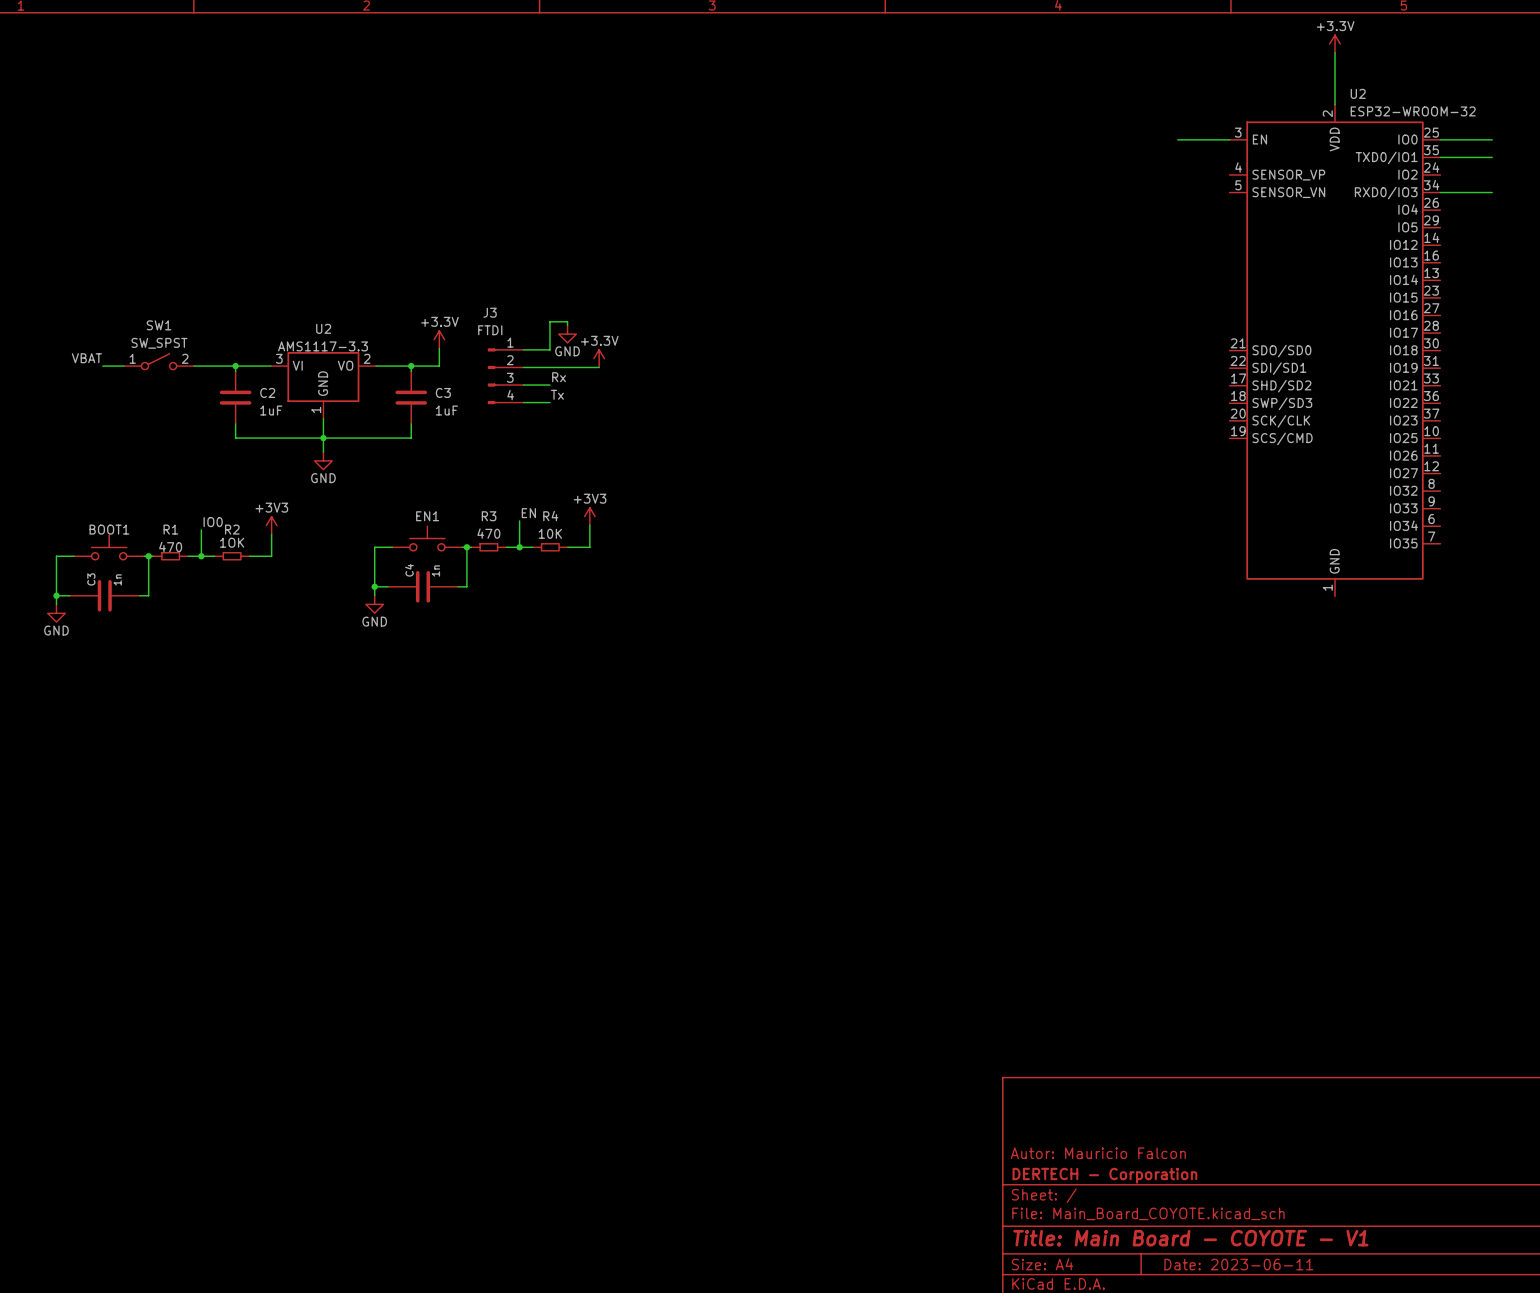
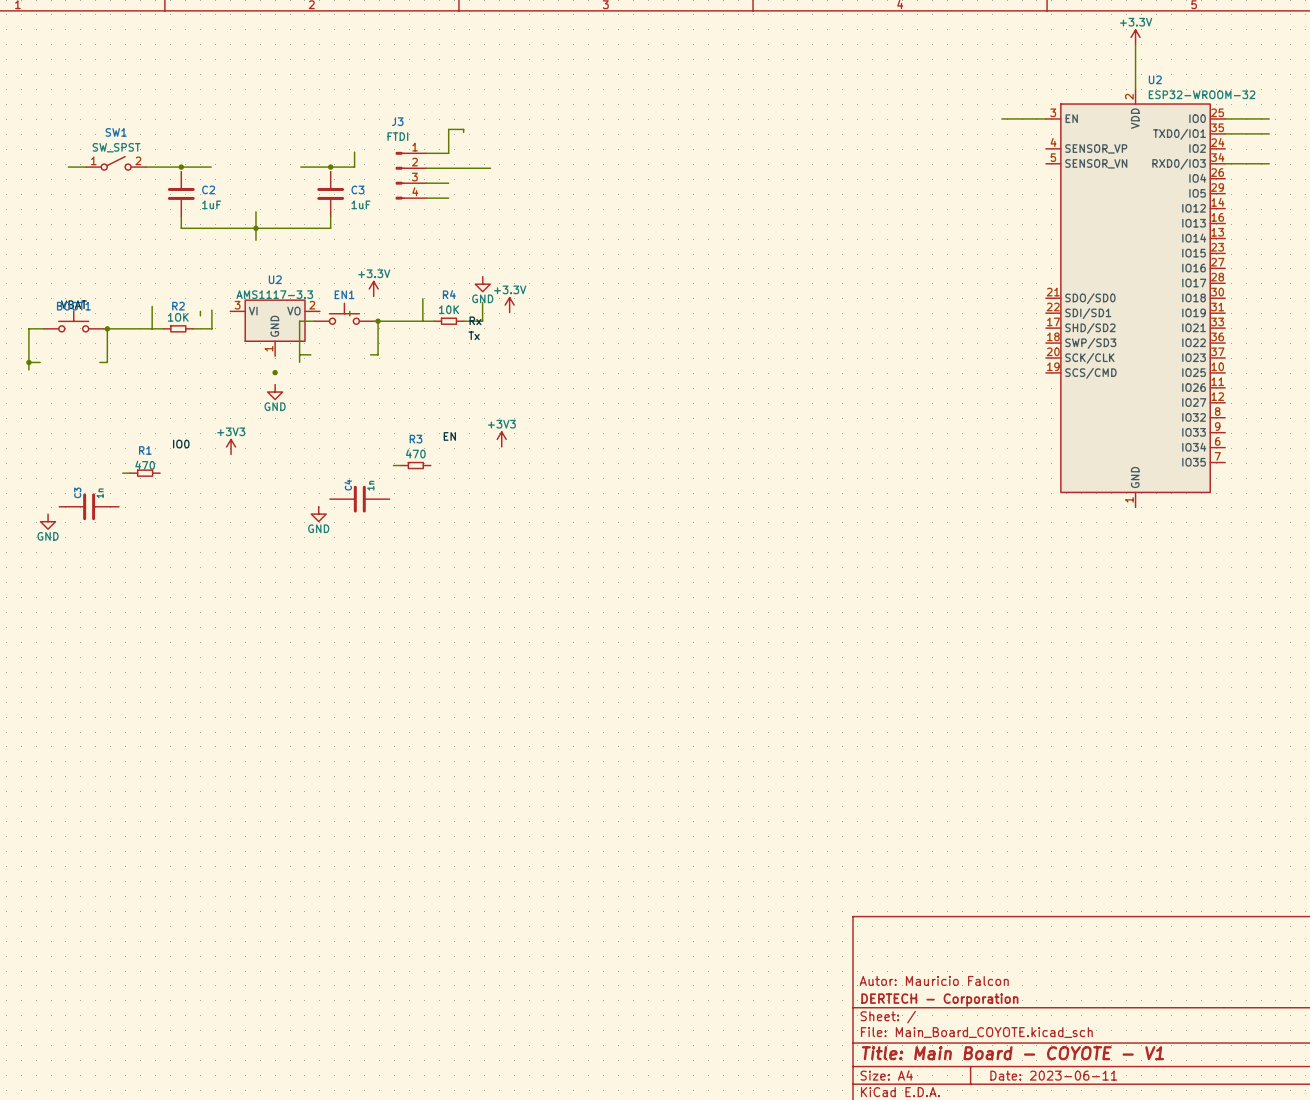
junction: none -> (181, 167)
junction: none -> (330, 167)
junction: none -> (255, 228)
wire: (567, 325) (567, 321) (549, 321) (549, 349) (523, 349) -> (463, 132) (463, 129) (448, 129) (448, 153) (426, 153)
wire: (439, 348) (439, 366) (376, 366) -> (354, 152) (354, 167) (300, 167)
SW1 position: (159, 361) -> (116, 163)
wire: (102, 366) (123, 366) -> (68, 167) (86, 167)
wire: (194, 366) (270, 366) -> (146, 167) (211, 167)
junction: (235, 366) -> none
junction position: (411, 366) -> (378, 321)
wire: (523, 367) (599, 367) -> (426, 168) (490, 168)
J3 position: (505, 376) -> (411, 175)
wire: none -> (374, 321) (434, 321)
wire: (523, 385) (549, 385) -> (426, 183) (448, 183)
wire: none -> (103, 328) (163, 328)
junction: none -> (107, 328)
C2 position: (235, 397) -> (181, 193)
C3 position: (411, 397) -> (330, 193)
wire: (523, 402) (549, 402) -> (426, 198) (448, 198)
wire: (323, 418) (323, 452) -> (255, 211) (255, 240)
wire: (235, 424) (235, 438) (411, 438) (411, 424) -> (181, 216) (181, 228) (330, 228) (330, 216)
junction: none -> (28, 362)
wire: (519, 520) (519, 547) -> (422, 298) (422, 321)
wire: (589, 525) (589, 547) (567, 547) -> (482, 302) (482, 321) (463, 321)
wire: (201, 529) (201, 556) -> (152, 306) (152, 328)
wire: (271, 534) (271, 556) (249, 556) -> (211, 310) (211, 328) (193, 328)
EN1 position: (427, 538) -> (344, 313)
BOOT1 position: (109, 547) -> (73, 321)
wire: (392, 547) (374, 547) (374, 595) -> (314, 321) (299, 321) (299, 362)
wire: (466, 547) (466, 586) (458, 586) -> (378, 321) (378, 354) (370, 354)
junction: (466, 547) -> none
wire: (506, 547) (532, 547) -> none
junction: (519, 547) -> none
R4 position: (550, 547) -> (448, 321)
wire: (74, 556) (56, 556) (56, 604) -> (43, 328) (28, 328) (28, 369)
wire: (148, 556) (148, 595) (139, 595) -> (107, 328) (107, 362) (99, 362)
junction: (148, 556) -> none
wire: (188, 556) (214, 556) -> none
junction: (201, 556) -> none
R2 position: (232, 556) -> (178, 328)
wire: (374, 586) (387, 586) -> (299, 354) (310, 354)
junction: (374, 586) -> none
wire: (56, 595) (69, 595) -> (28, 362) (40, 362)
junction: (56, 595) -> none

